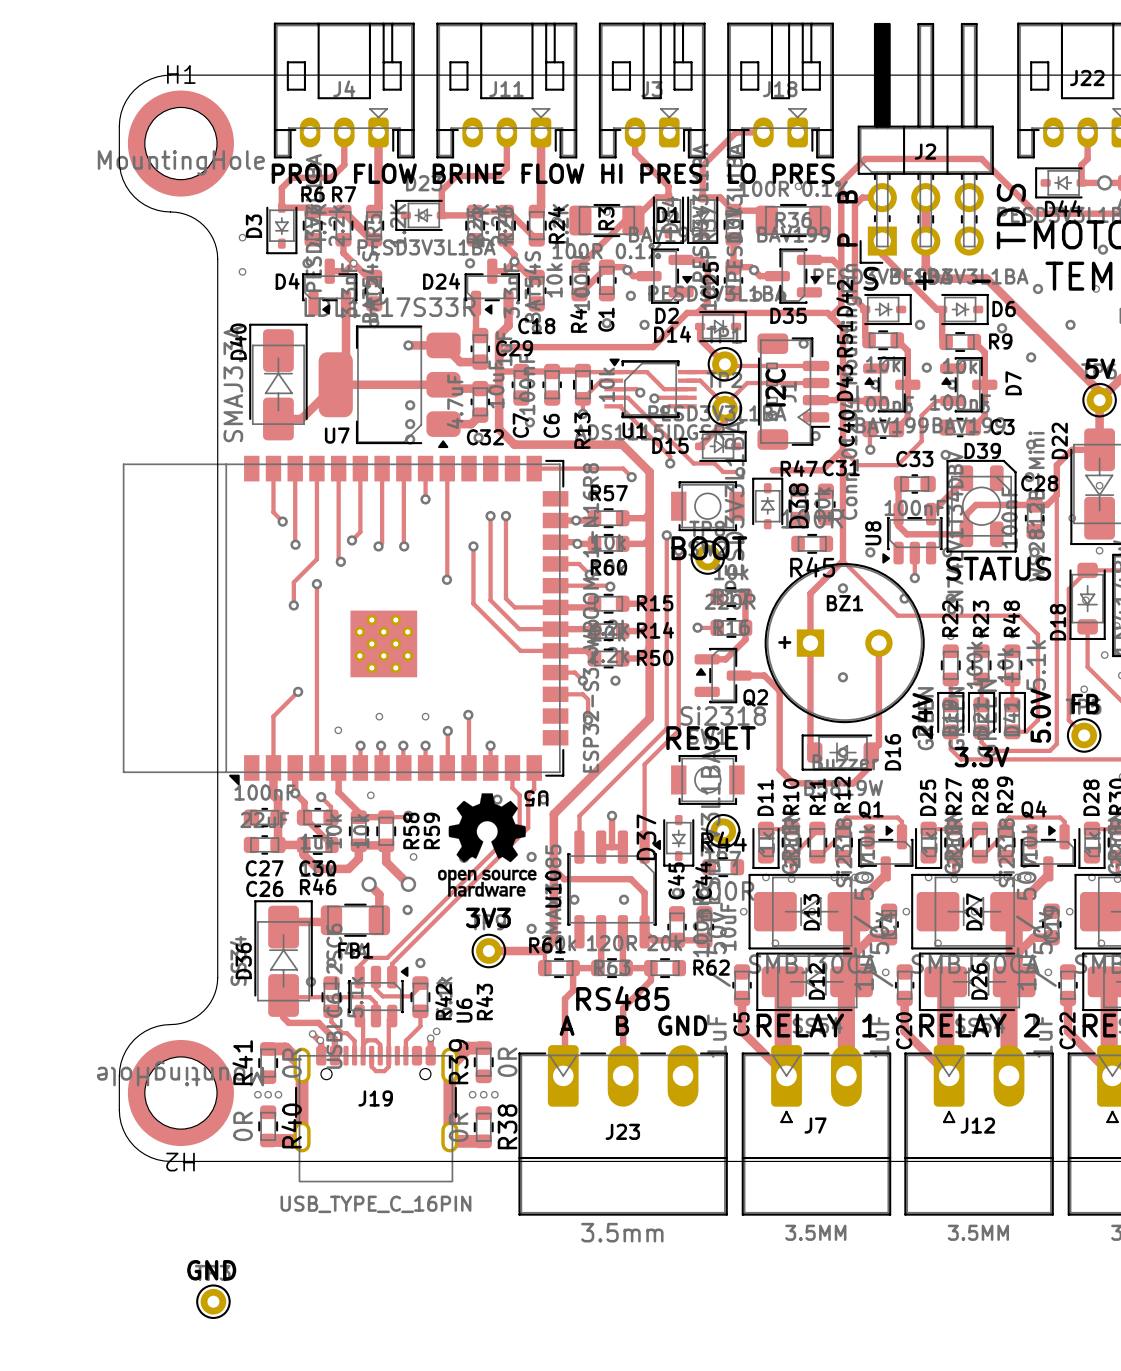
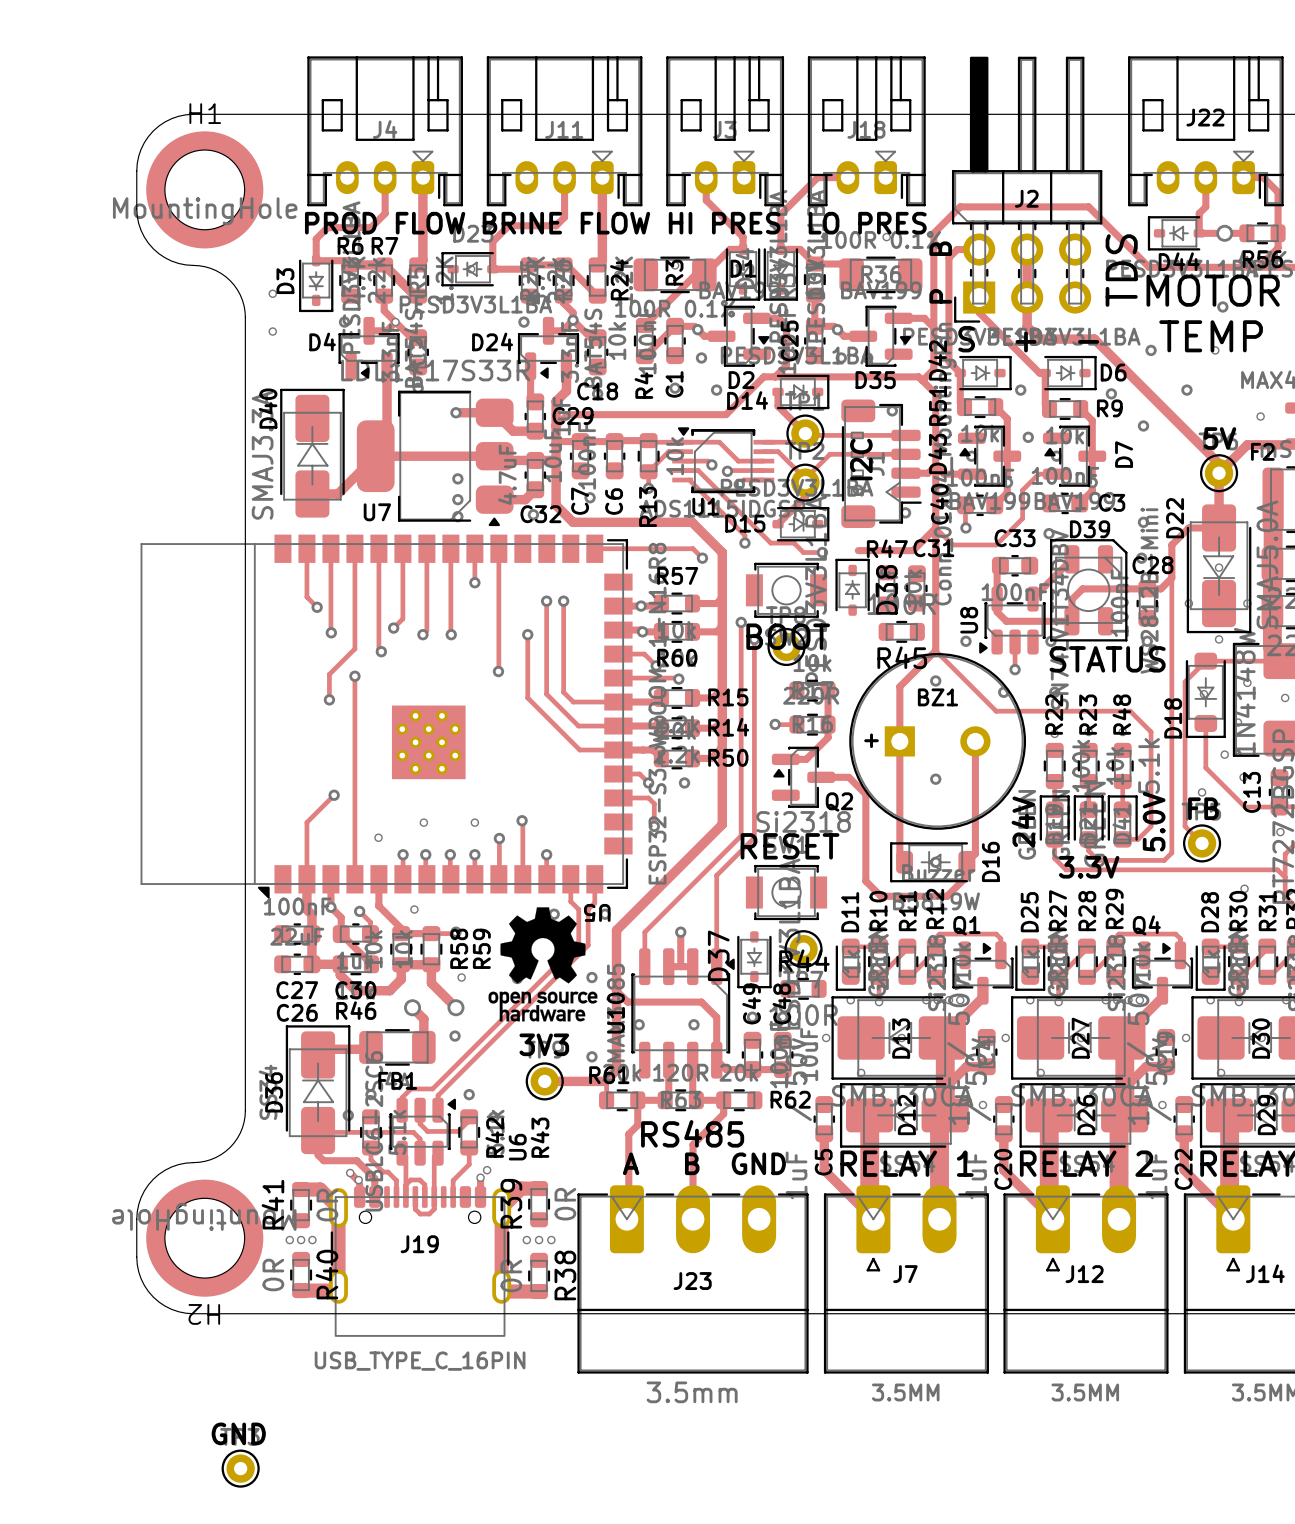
C45 name: C45 (676, 880) -> C49 (751, 1003)
C44 name: C44 (703, 880) -> C48 (781, 1003)

